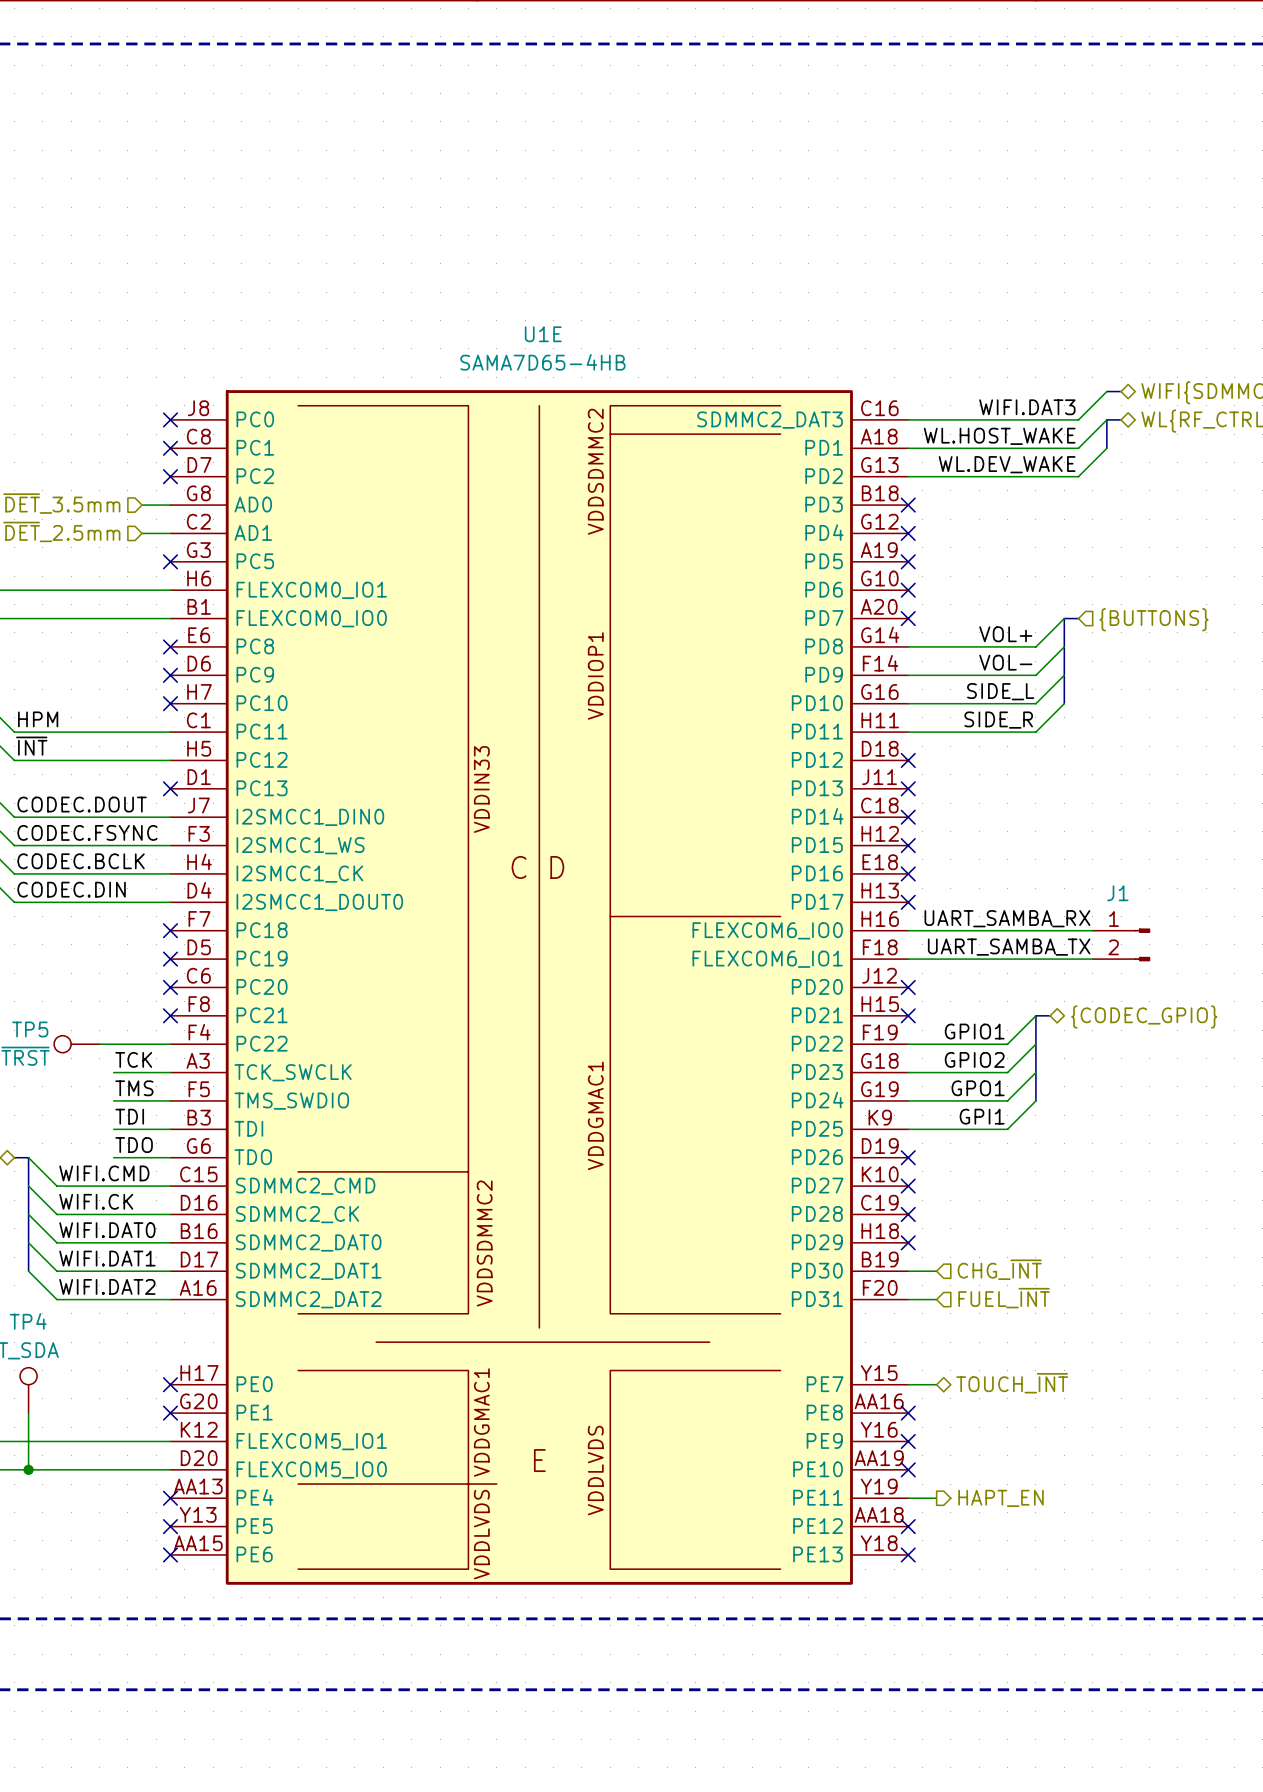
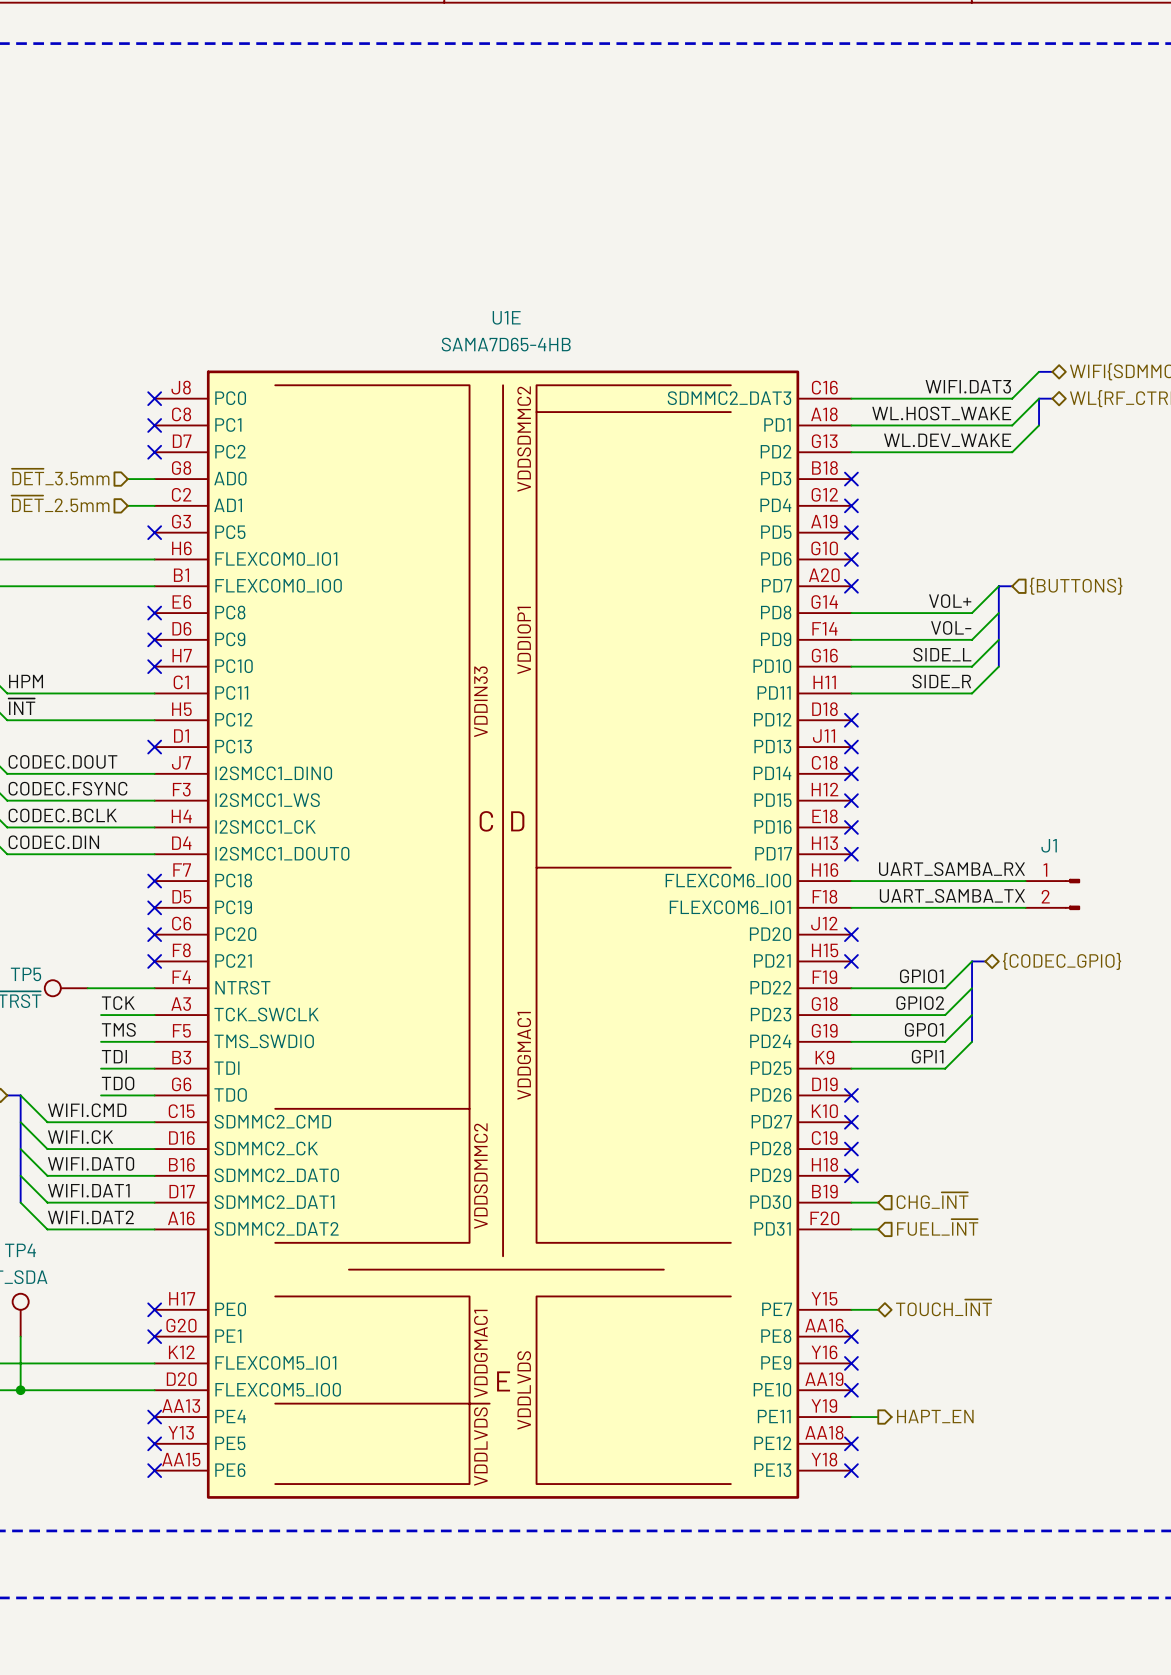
U1E symbol: [170, 390, 909, 1585] -> [154, 370, 852, 1499]

